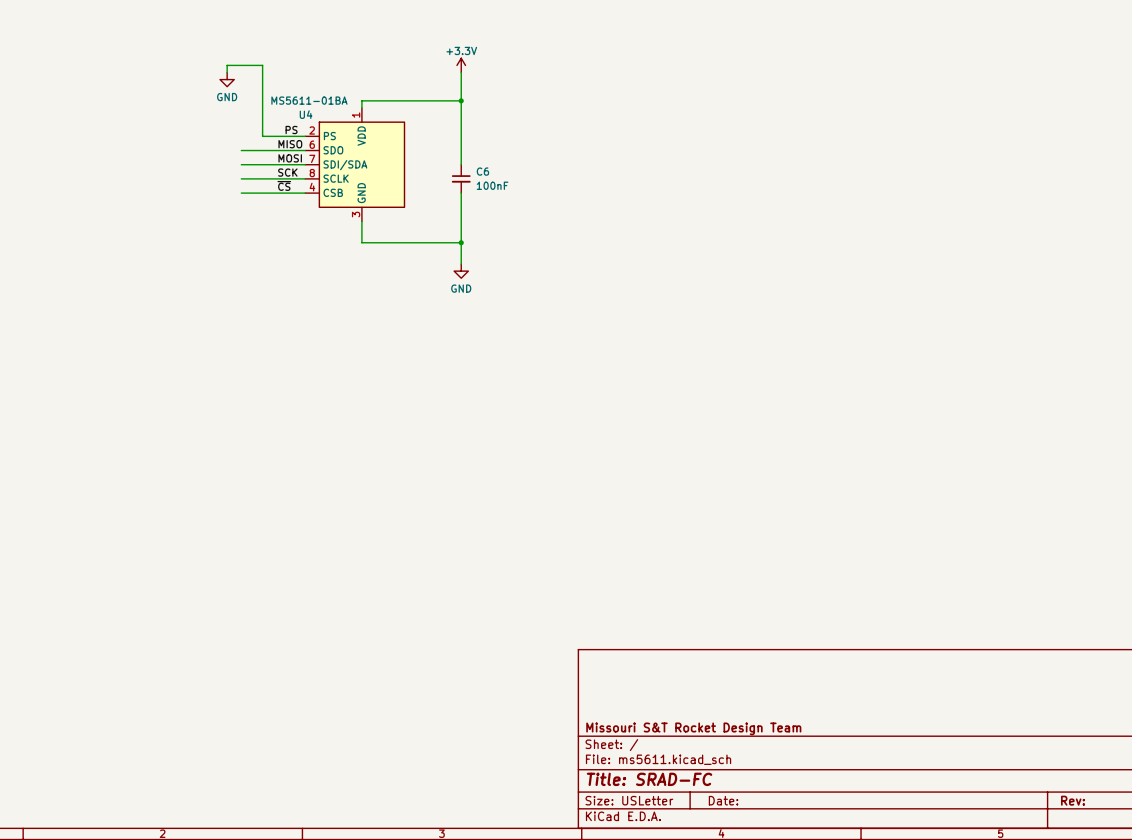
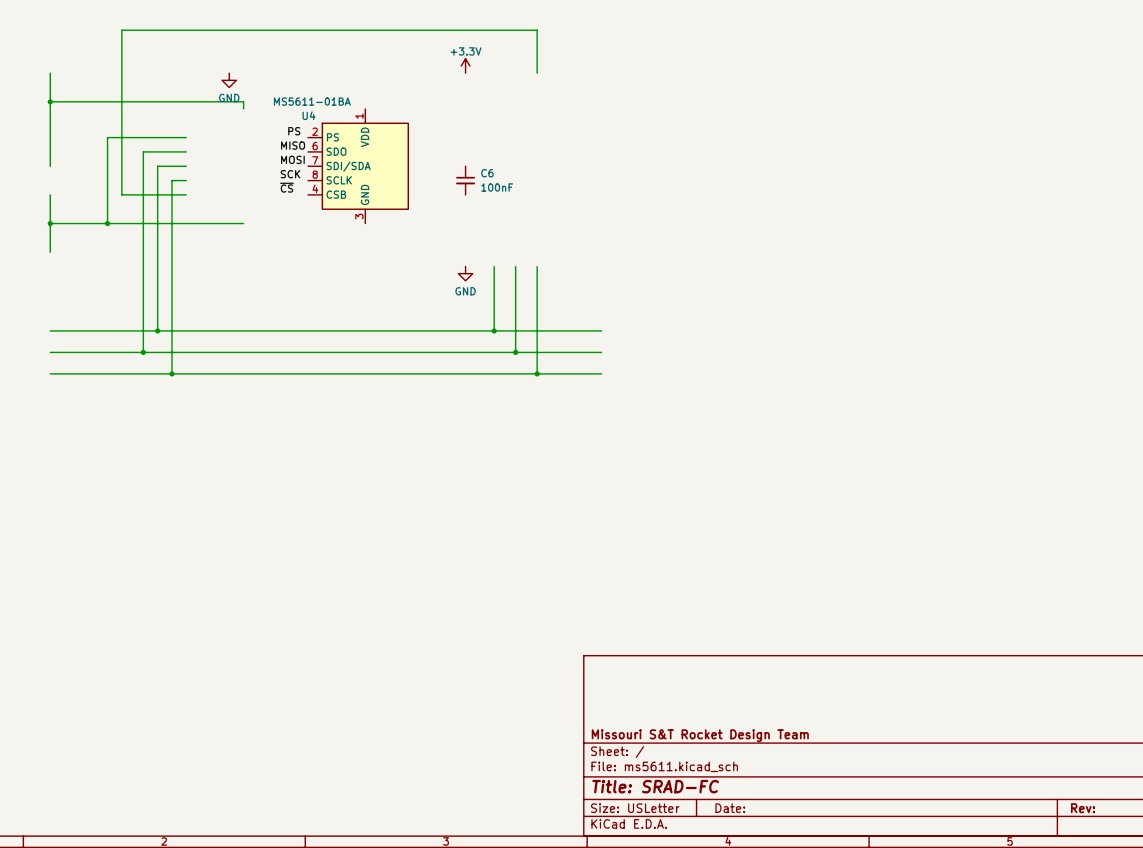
wire: none -> (50, 73) (50, 166)
wire: (227, 72) (227, 65) (262, 65) (262, 136) (305, 136) -> none
wire: (461, 72) (461, 164) -> none
wire: none -> (537, 73) (537, 30) (121, 30) (121, 194) (186, 194)
wire: none -> (50, 101) (243, 101) (243, 108)
junction: none -> (50, 101)
wire: (461, 100) (361, 100) (361, 107) -> none
junction: (461, 100) -> none
wire: none -> (186, 137) (107, 137) (107, 223)
wire: none -> (186, 151) (143, 151) (143, 352)
wire: (241, 150) (305, 150) -> none
wire: none -> (186, 166) (157, 166) (157, 330)
wire: (241, 164) (305, 164) -> none
wire: none -> (186, 180) (171, 180) (171, 373)
wire: (241, 178) (305, 178) -> none
wire: none -> (50, 194) (50, 252)
wire: (241, 193) (305, 193) -> none
wire: (461, 193) (461, 264) -> none
wire: none -> (50, 223) (243, 223)
junction: none -> (50, 223)
junction: none -> (107, 223)
wire: (361, 221) (361, 242) (461, 242) -> none
junction: (461, 242) -> none
wire: none -> (494, 266) (494, 330)
wire: none -> (515, 266) (515, 352)
wire: none -> (537, 266) (537, 373)
wire: none -> (50, 330) (601, 330)
junction: none -> (157, 330)
junction: none -> (494, 330)
wire: none -> (50, 352) (601, 352)
junction: none -> (143, 352)
junction: none -> (515, 352)
wire: none -> (50, 373) (601, 373)
junction: none -> (171, 373)
junction: none -> (537, 373)

